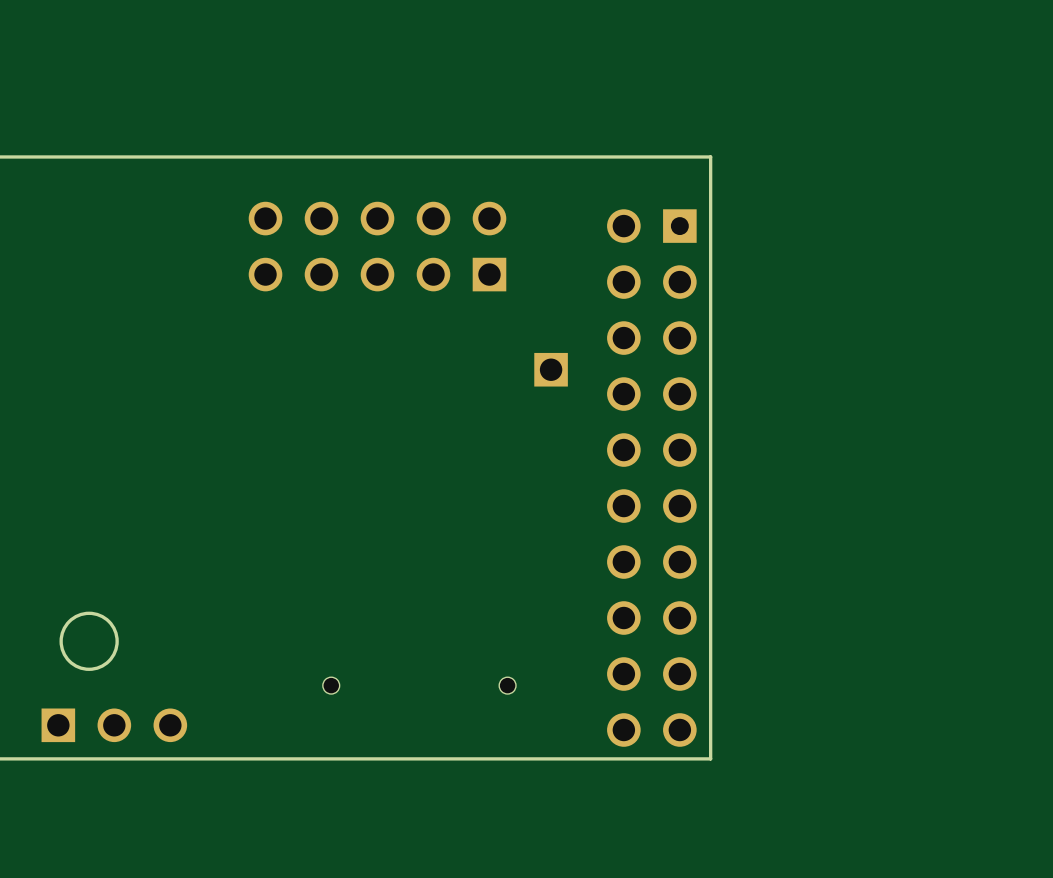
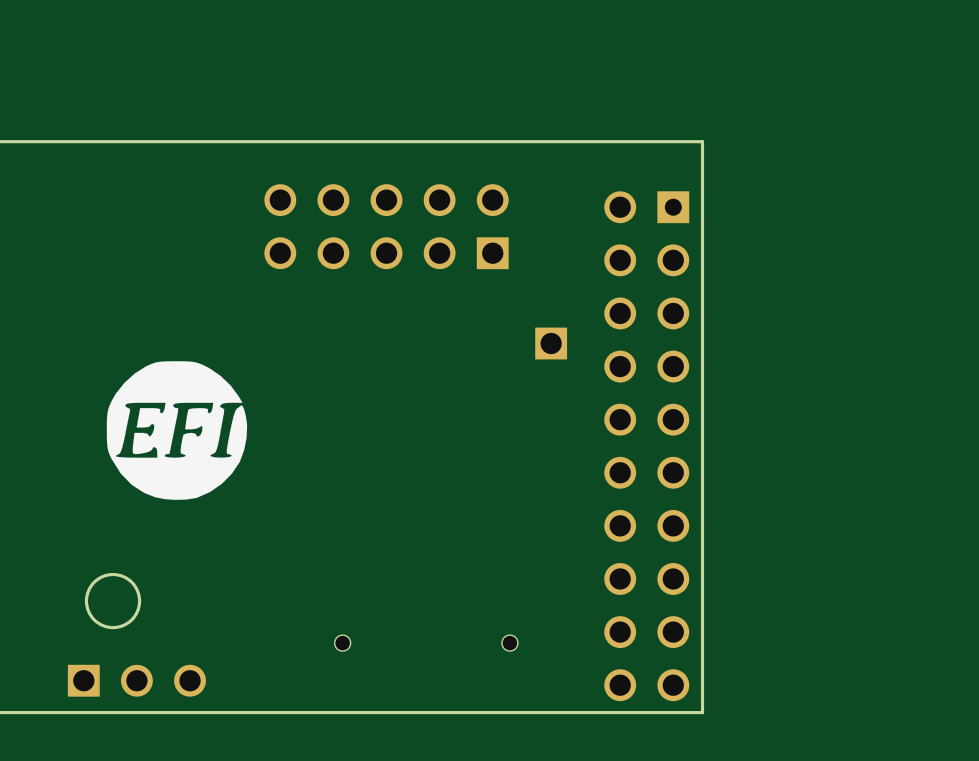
drawing: none -> [106, 361, 248, 500]

